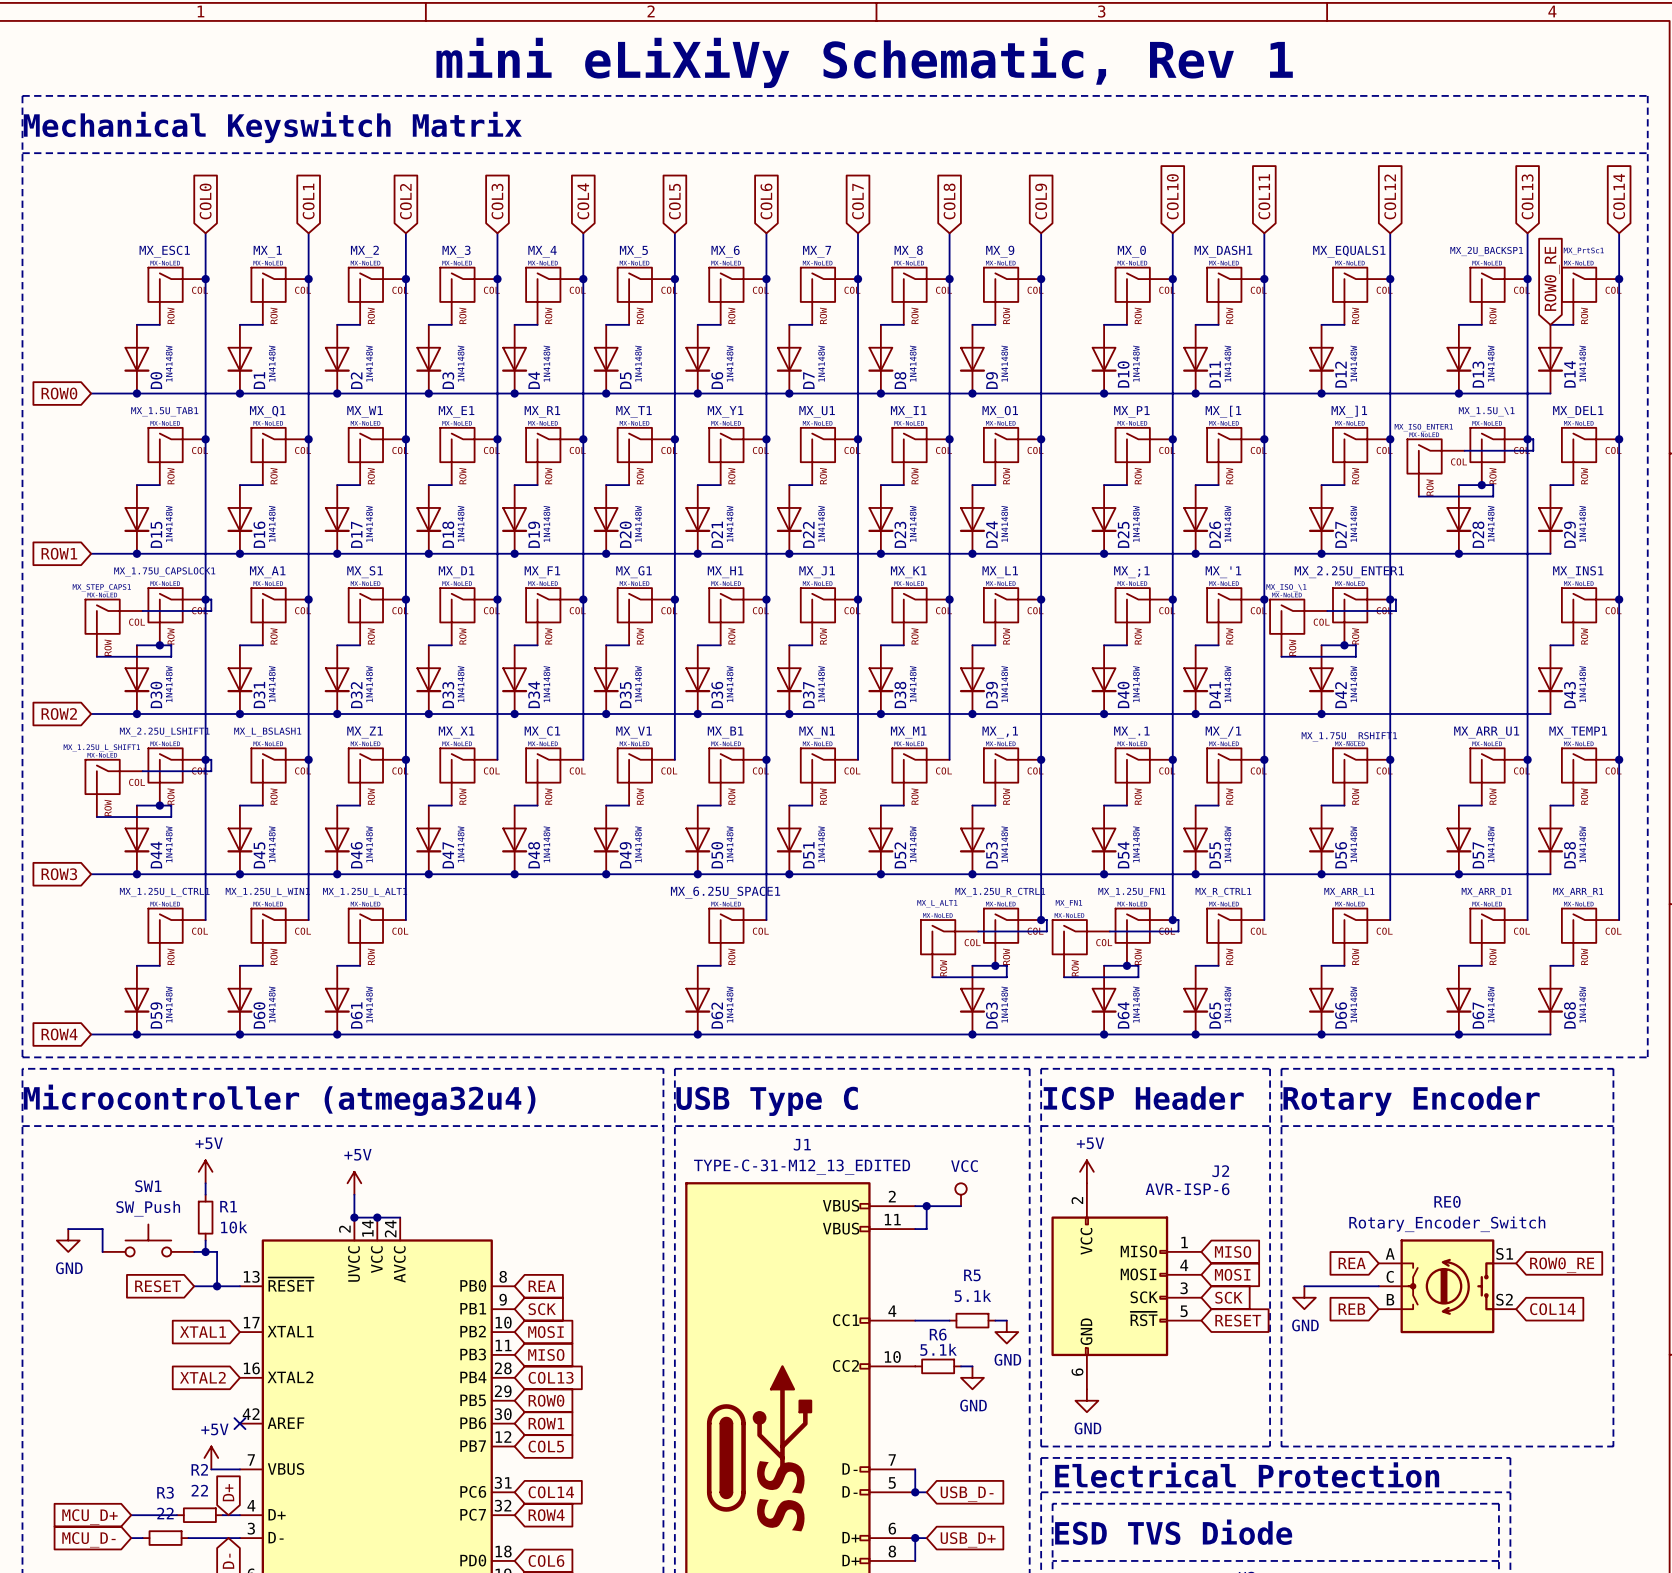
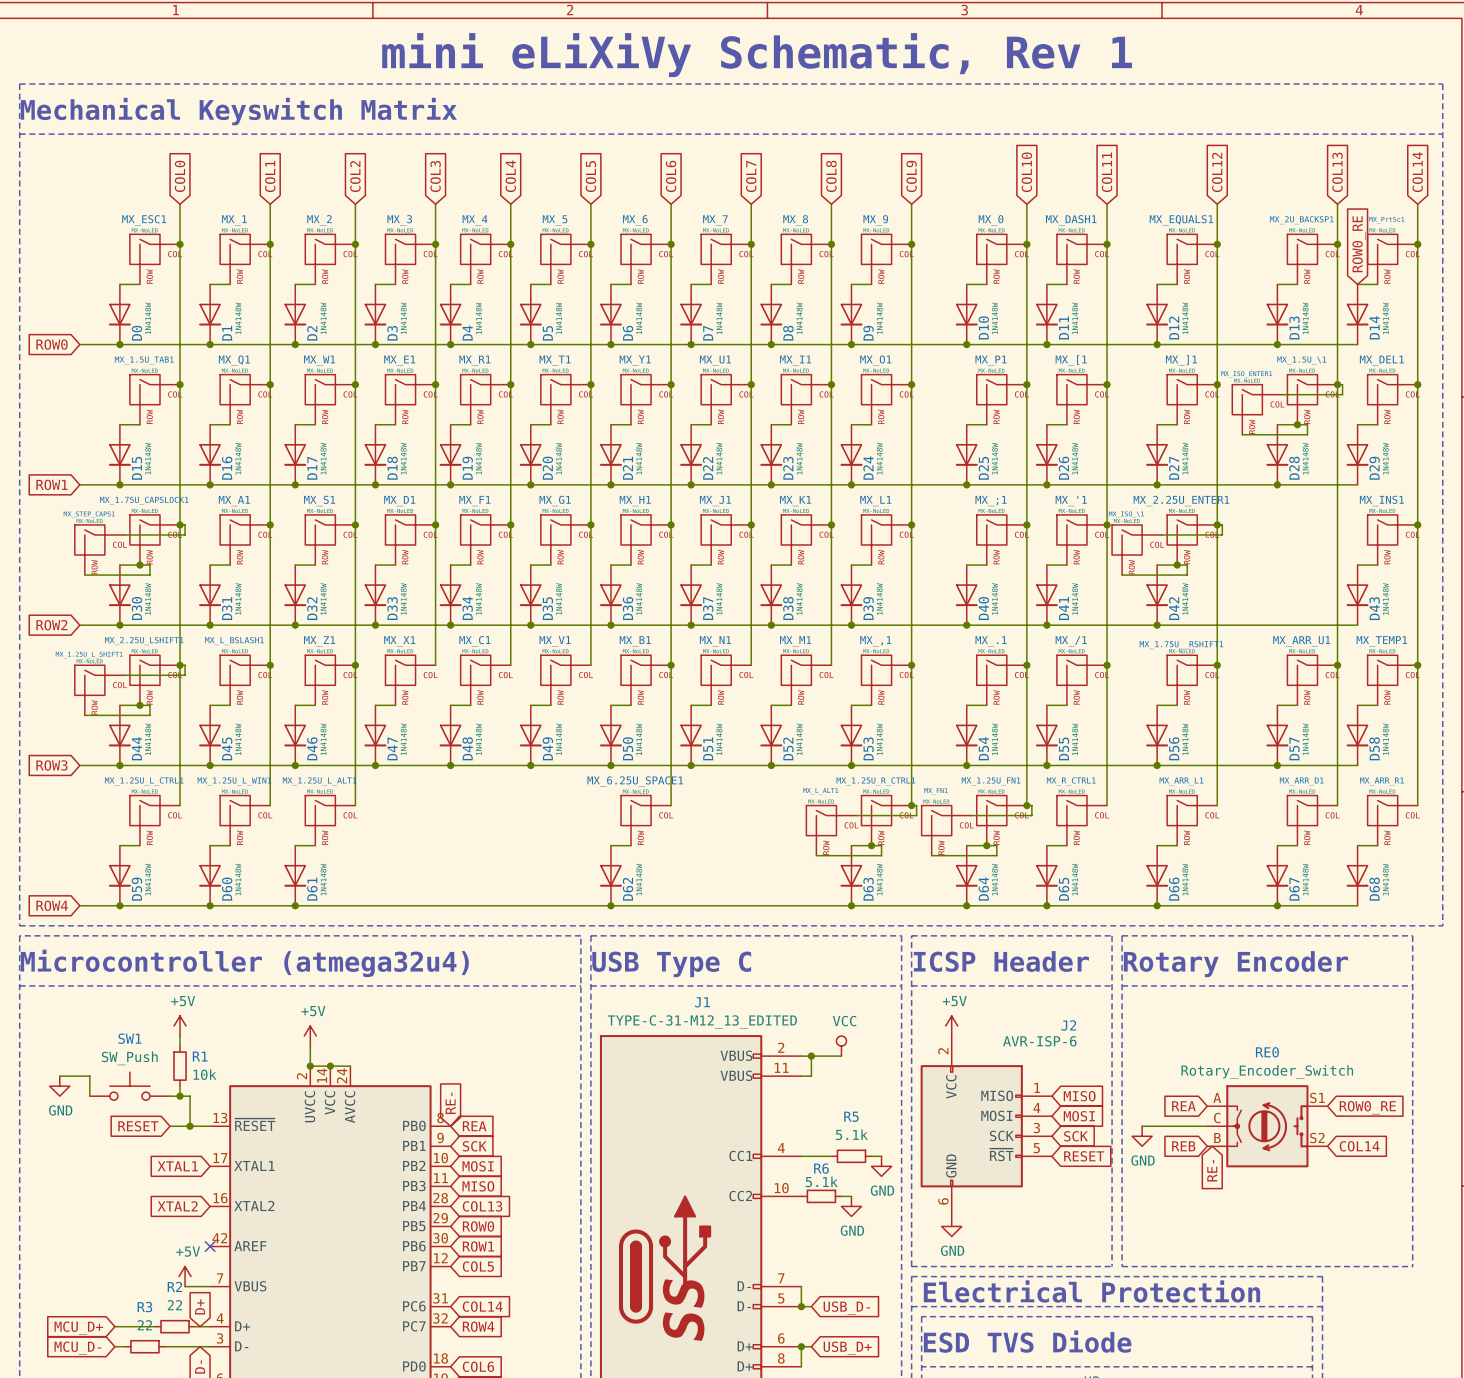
global label: none -> RE- (450, 1103)
global label: none -> RE- (1212, 1170)

